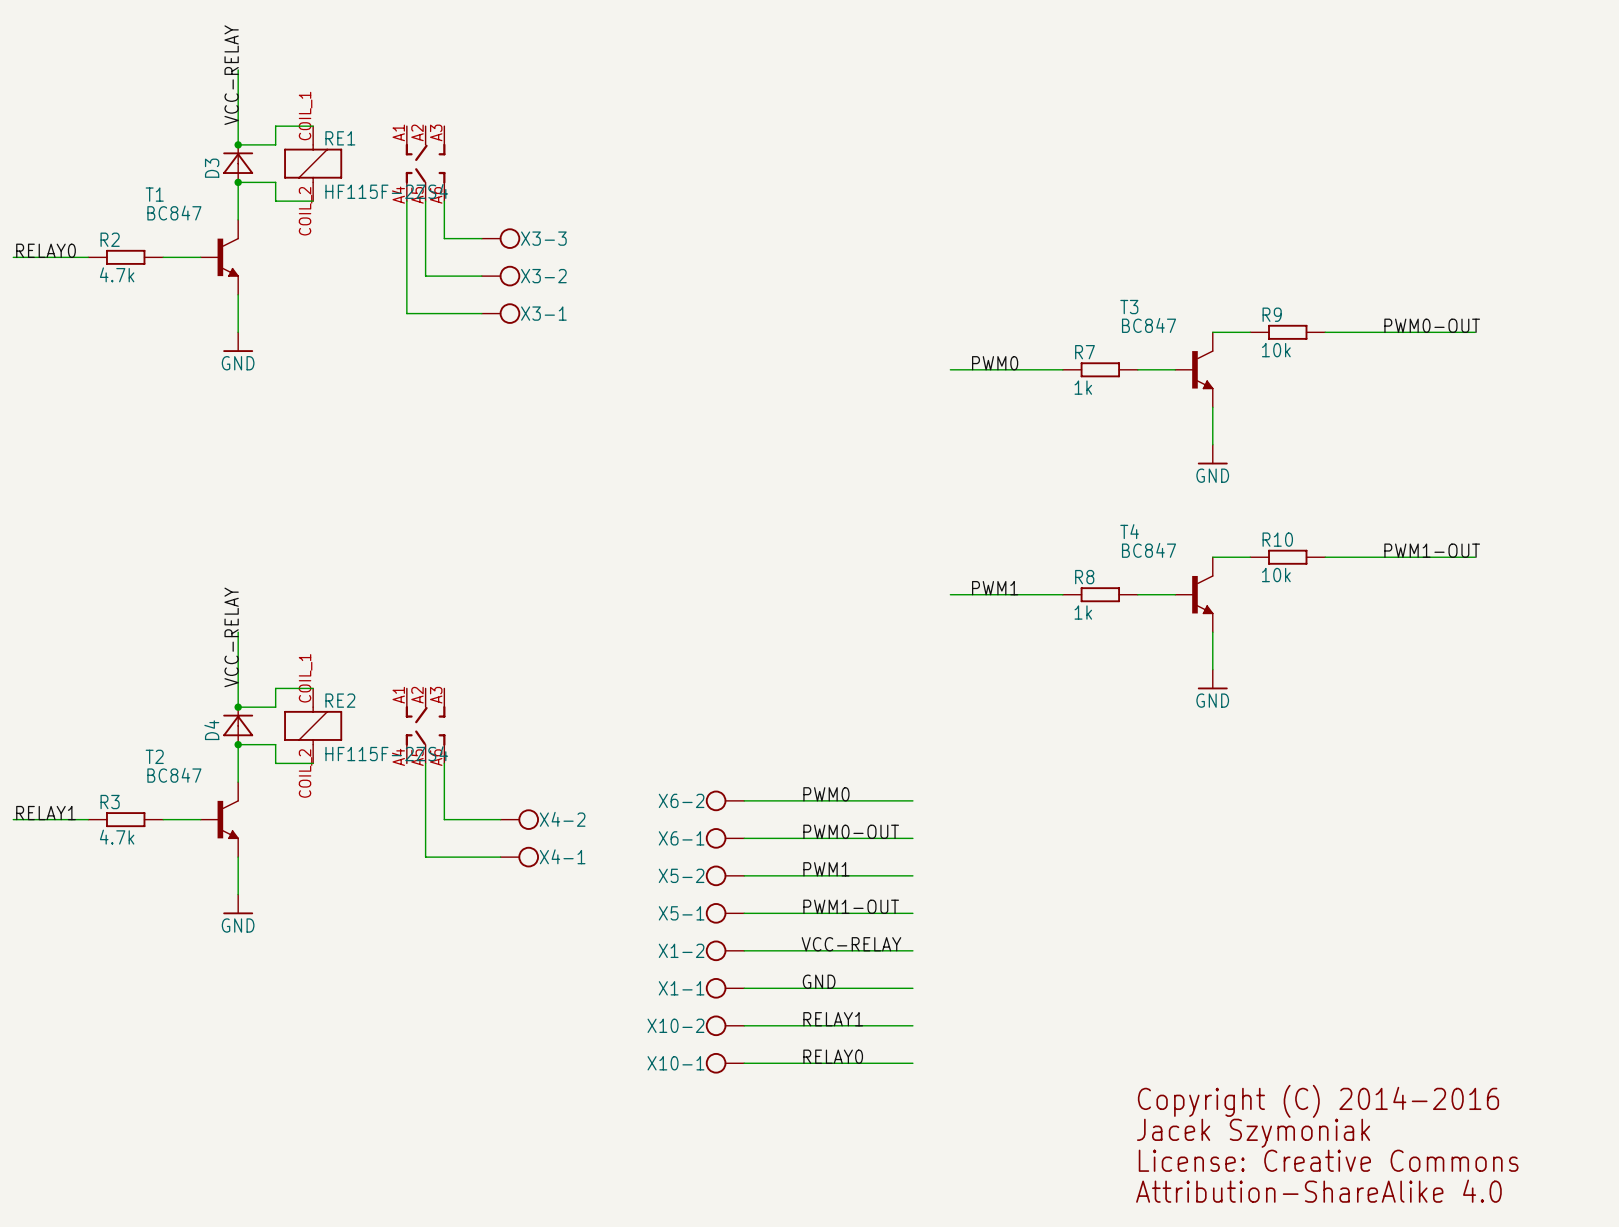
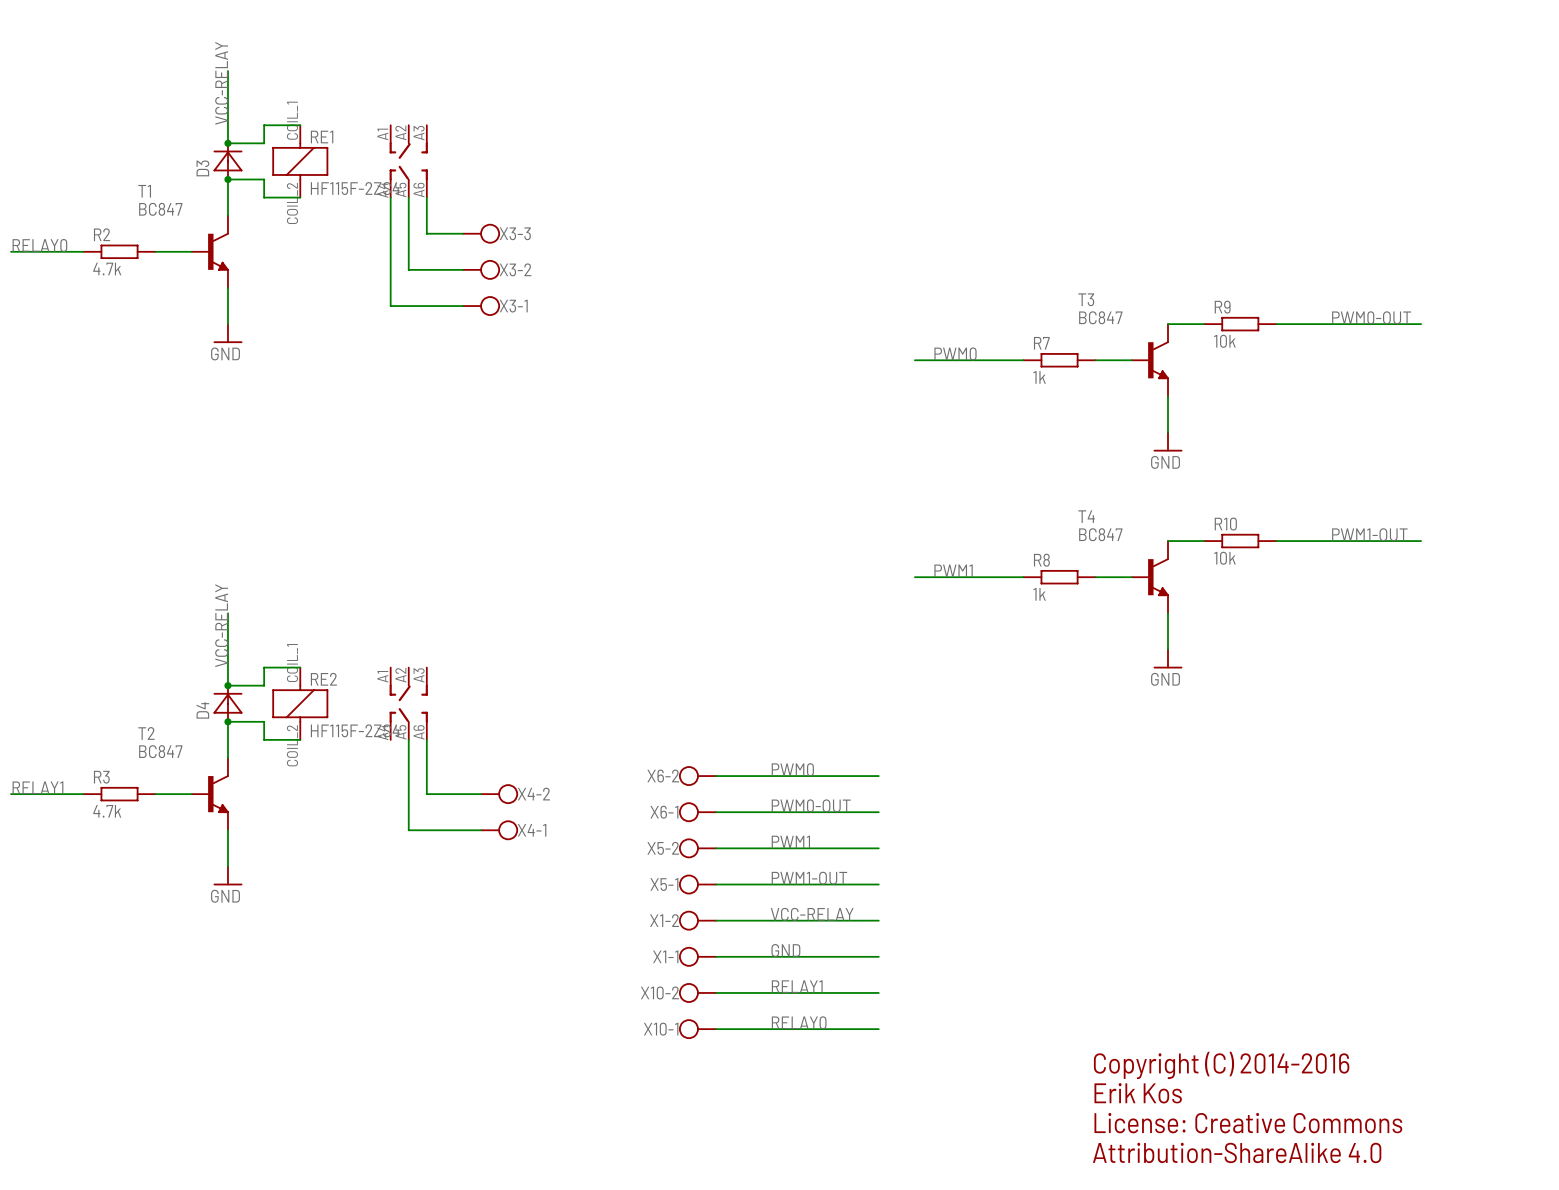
text: Jacek Szymoniak (1253, 1133) -> Erik Kos (1138, 1093)

